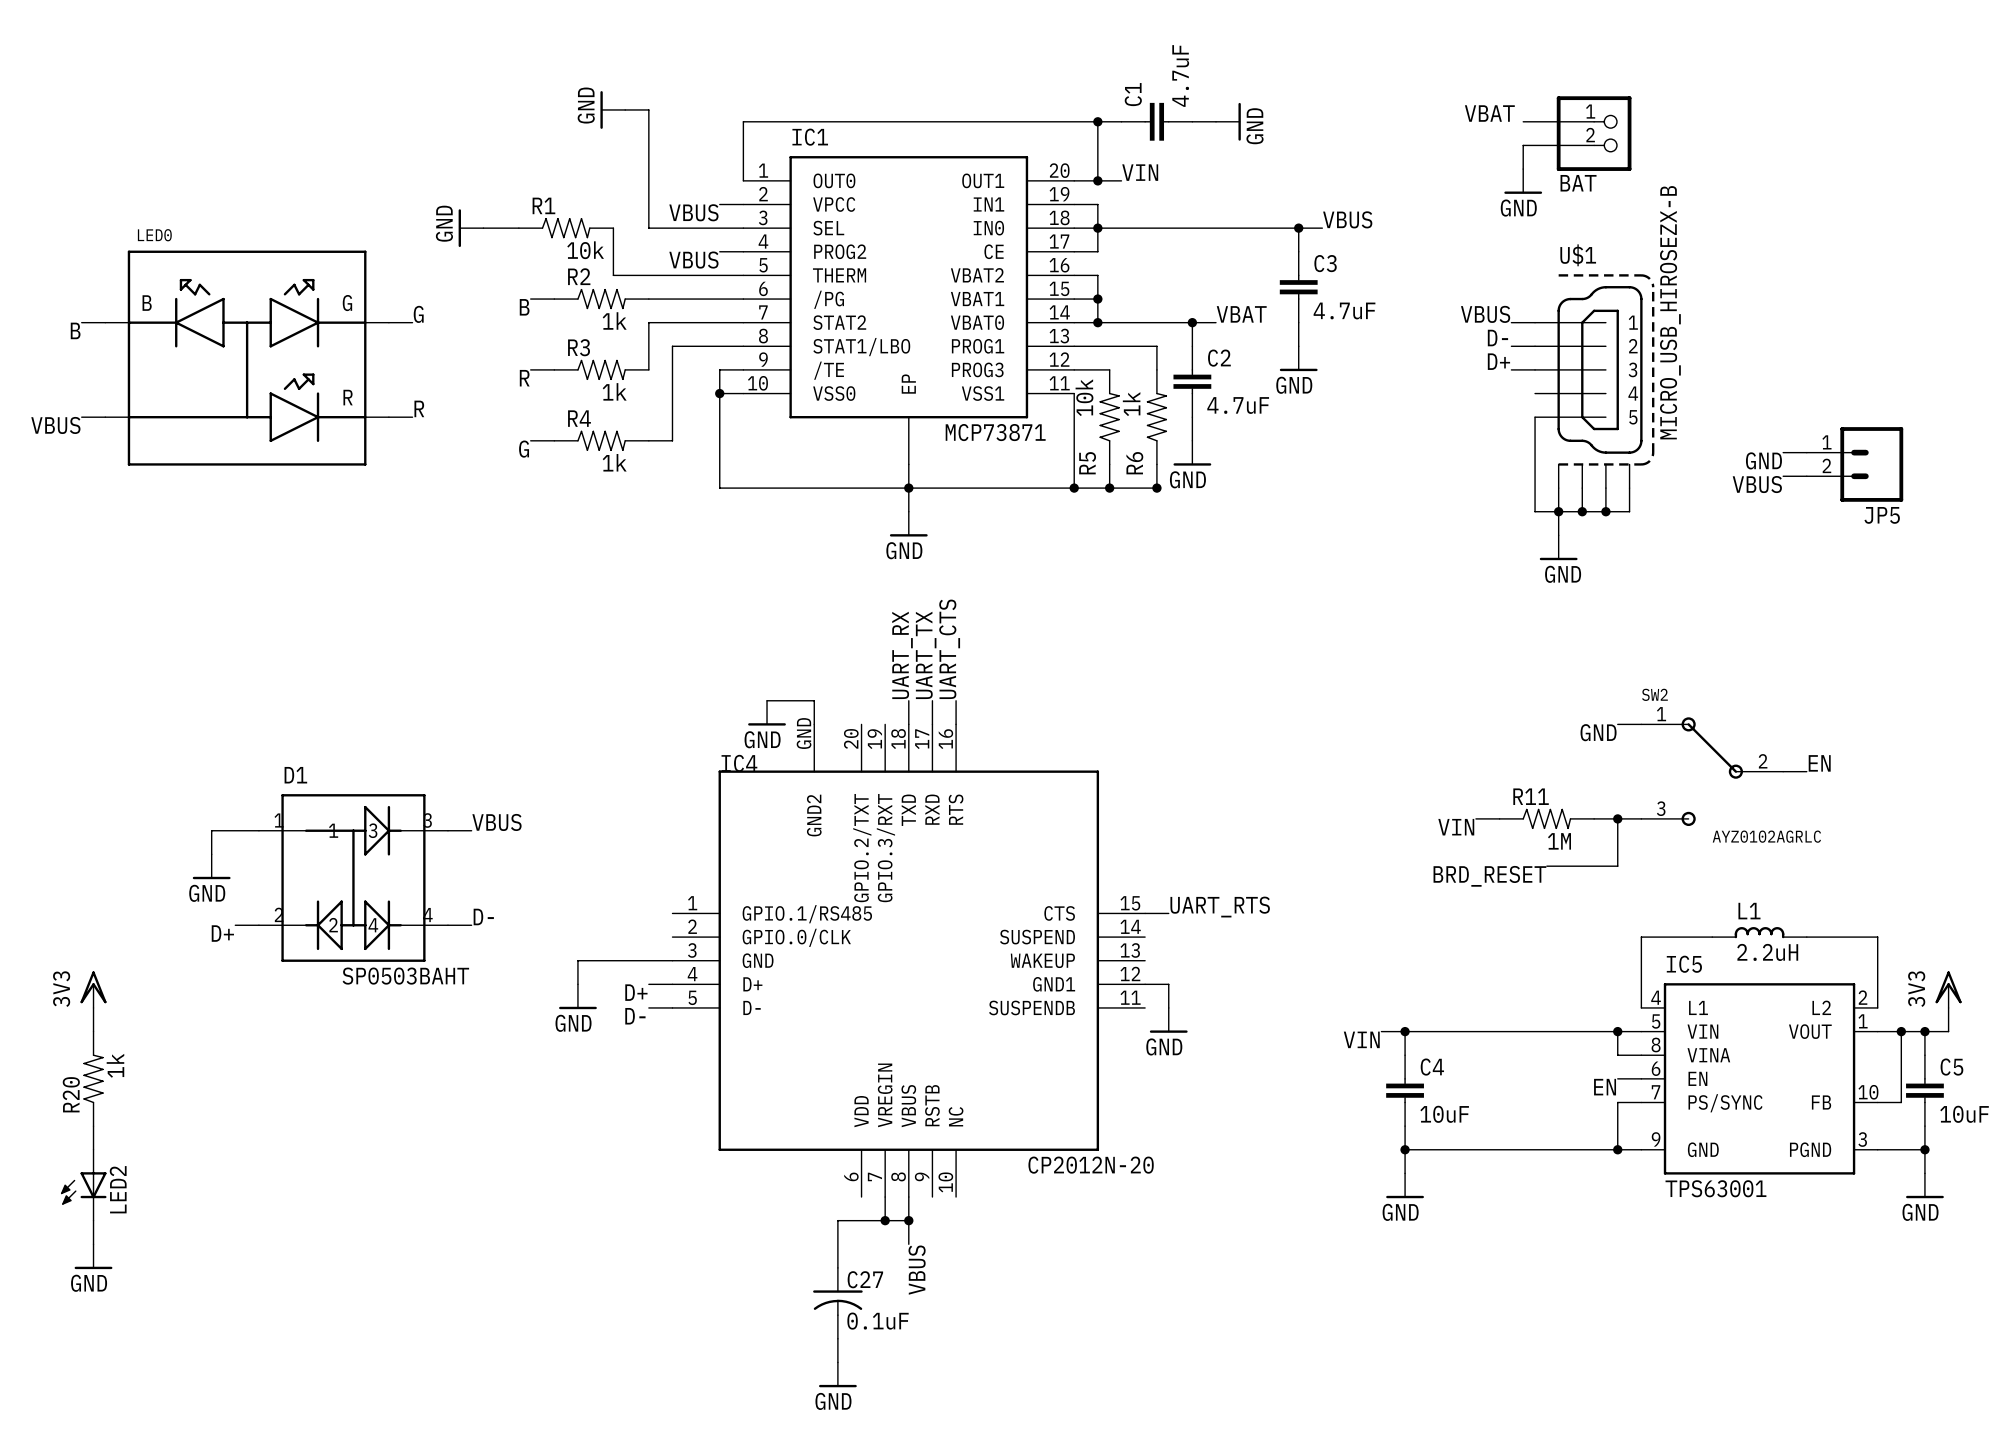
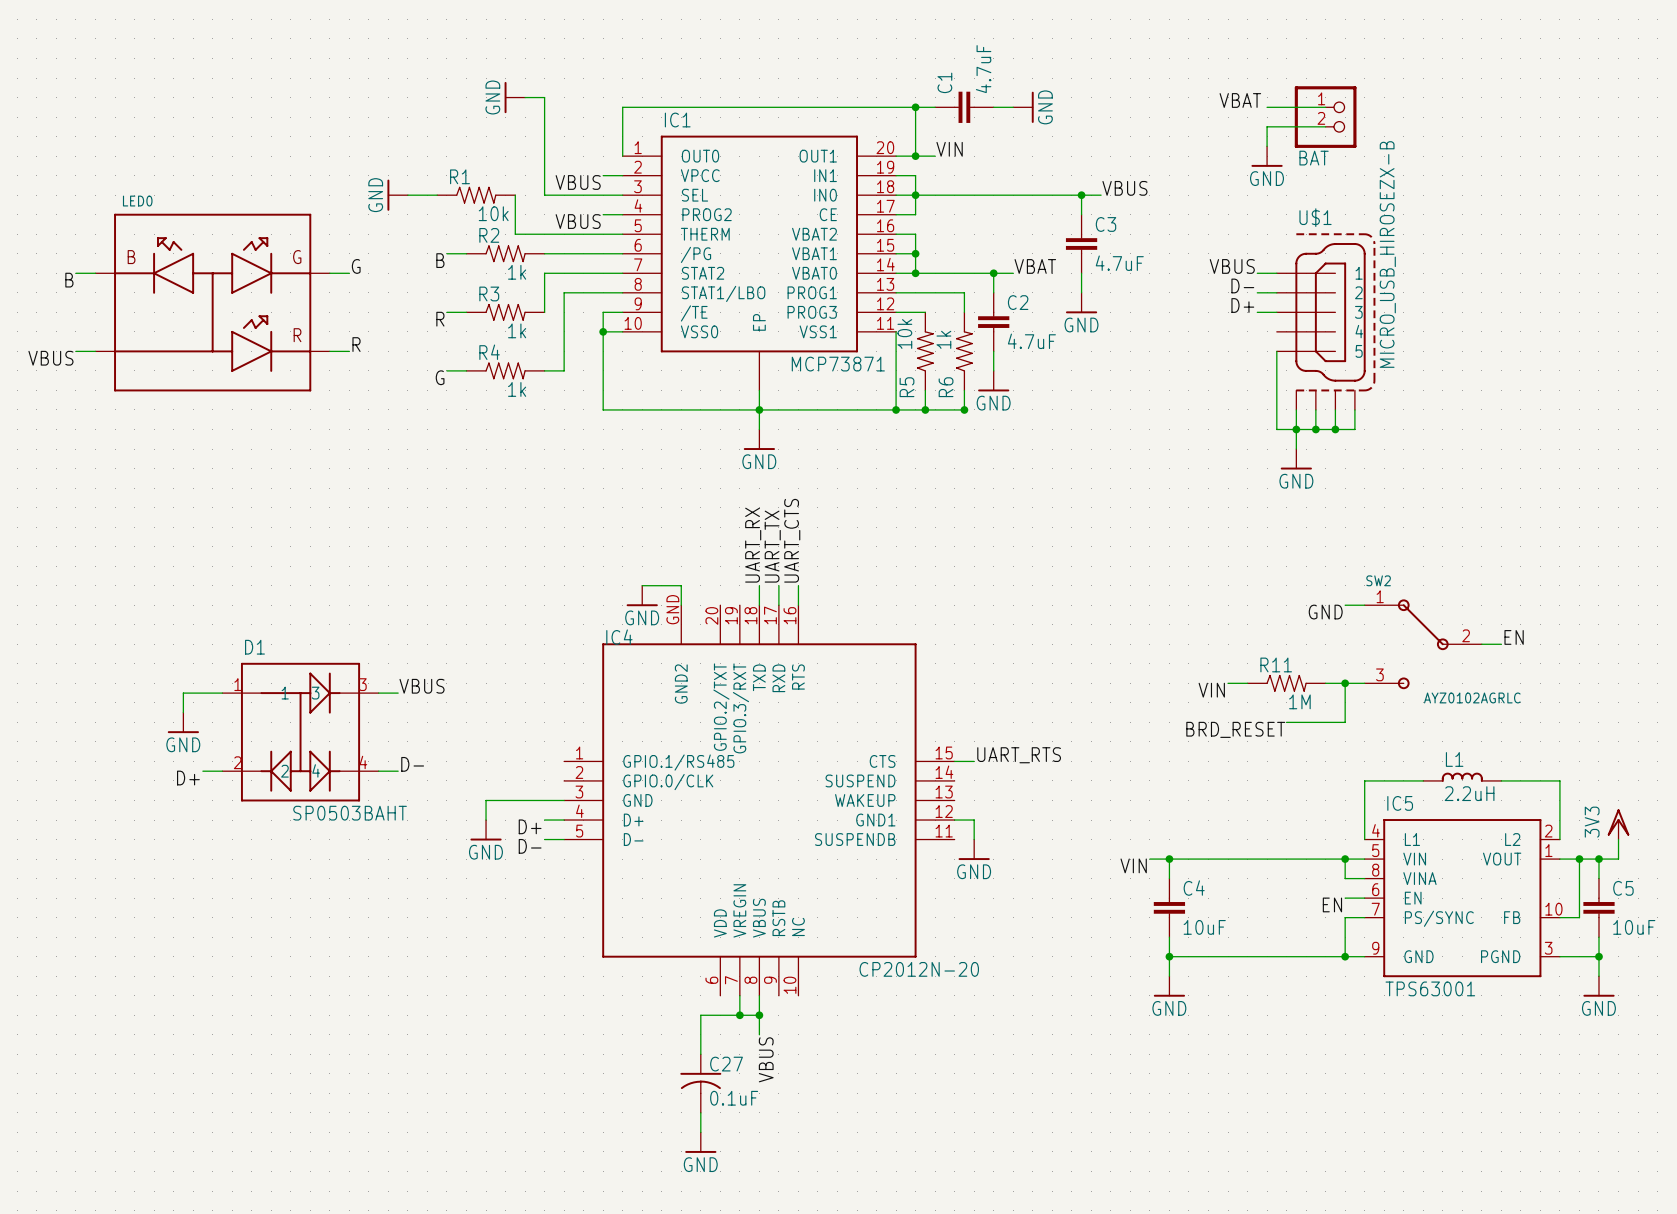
wire: (1783, 452) (1806, 452) -> none
label: GND (1763, 460) -> none
JP5: (1855, 464) -> none
wire: (1783, 476) (1806, 476) -> none
label: VBUS (1757, 484) -> none
power symbol: 3V3 (93, 989) -> none
wire: (93, 1007) (93, 1031) -> none
R20: 1k (93, 1078) -> none
wire: (93, 1126) (93, 1149) -> none
LED2: (83, 1185) -> none
wire: (93, 1220) (93, 1244) -> none
power symbol: GND (93, 1256) -> none

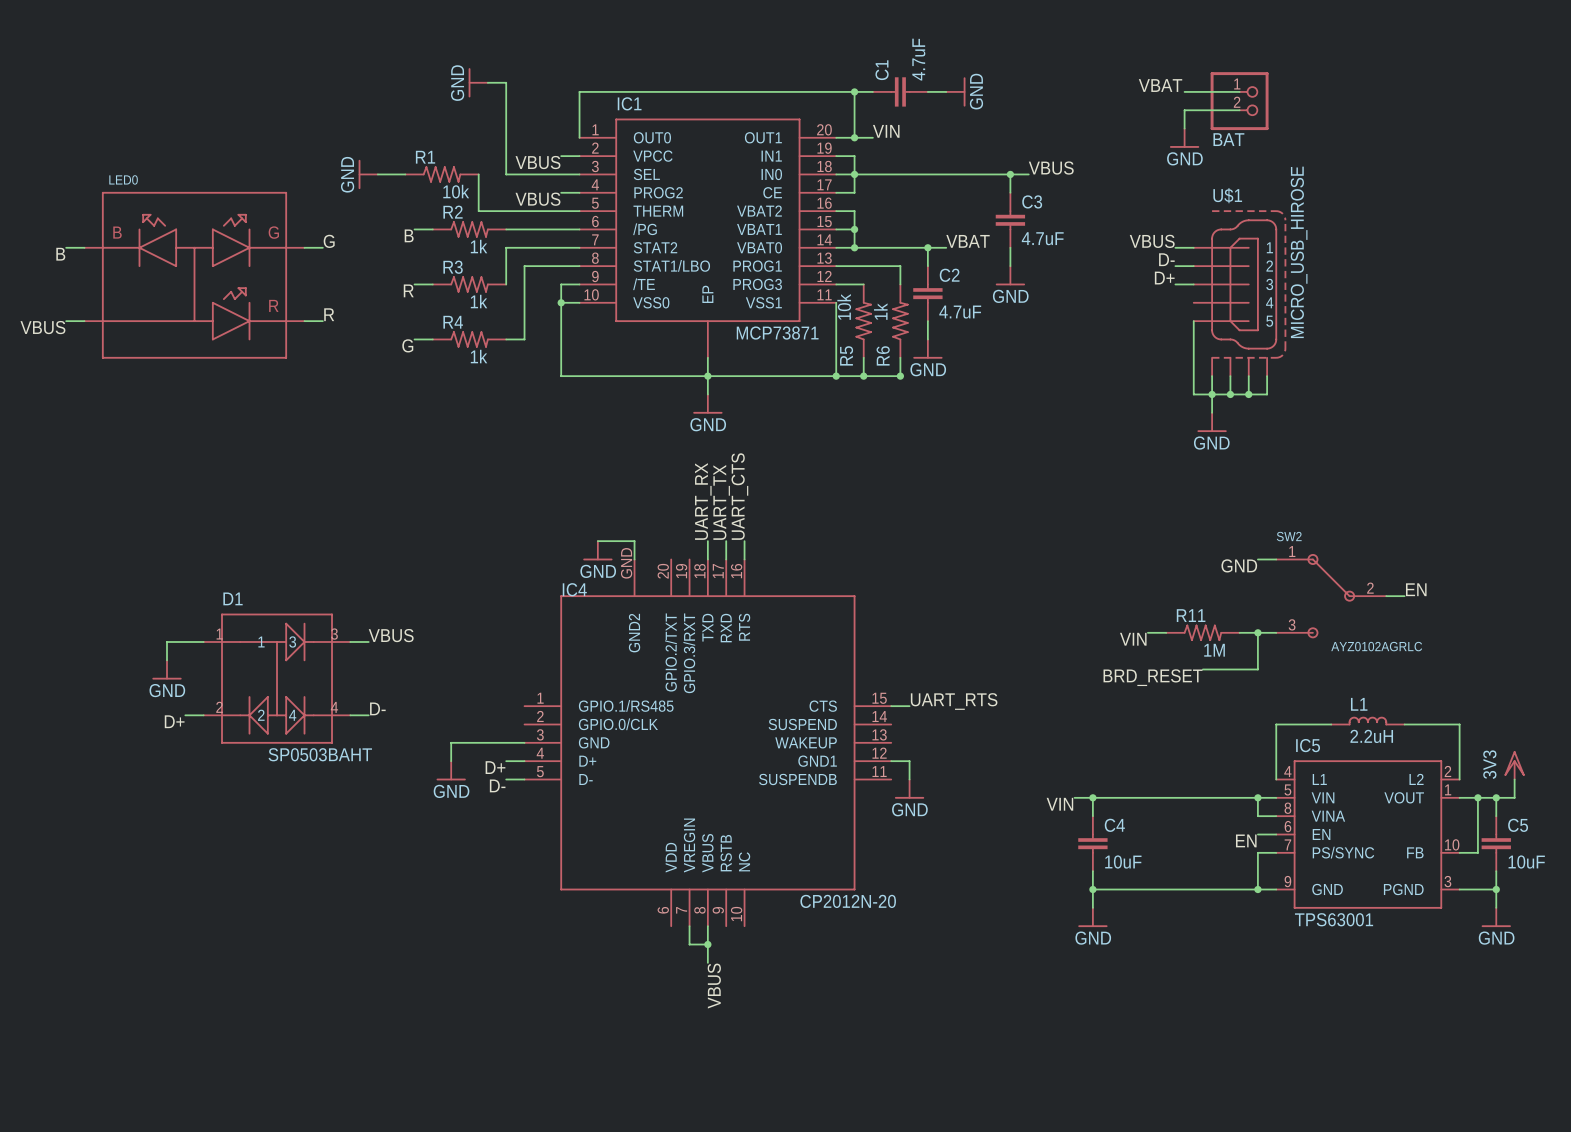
U$1 value: MICRO_USB_HIROSEZX-B (1387, 254) -> MICRO_USB_HIROSE (1299, 252)
wire: (739, 1015) (700, 1015) (700, 1054) -> none
junction: (739, 1015) -> none
C27: 0.1uF (700, 1083) -> none
wire: (700, 1112) (700, 1132) -> none
power symbol: GND (700, 1142) -> none

